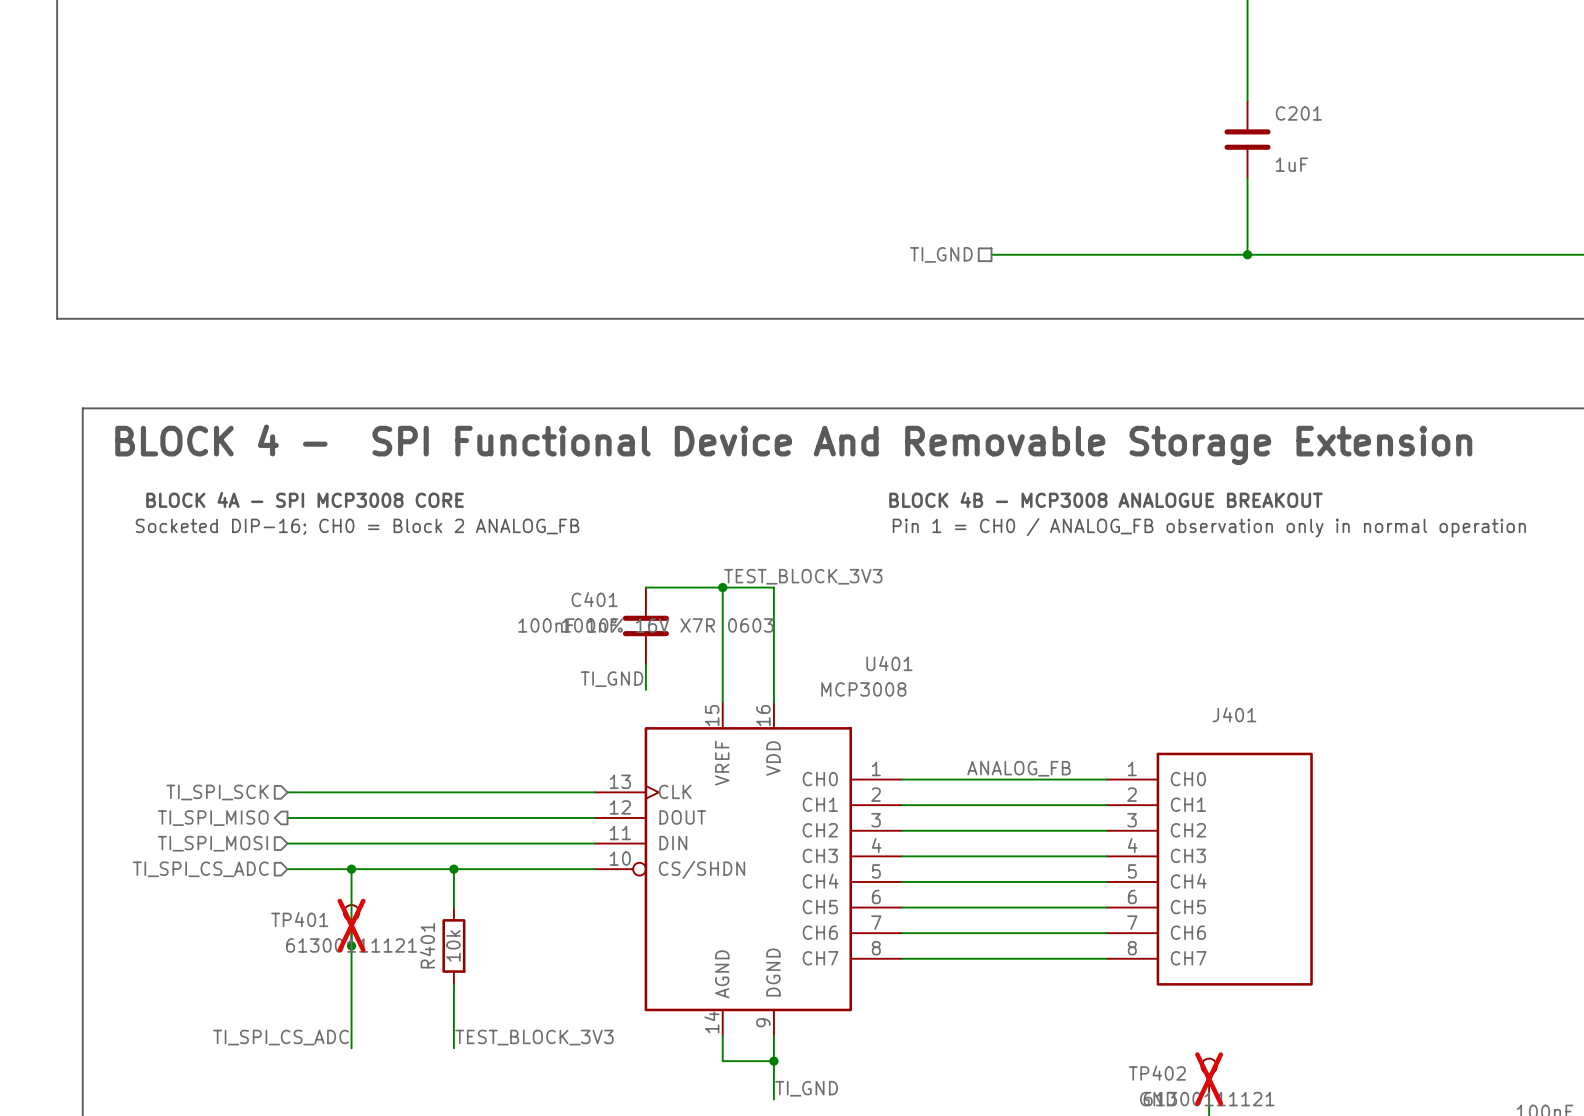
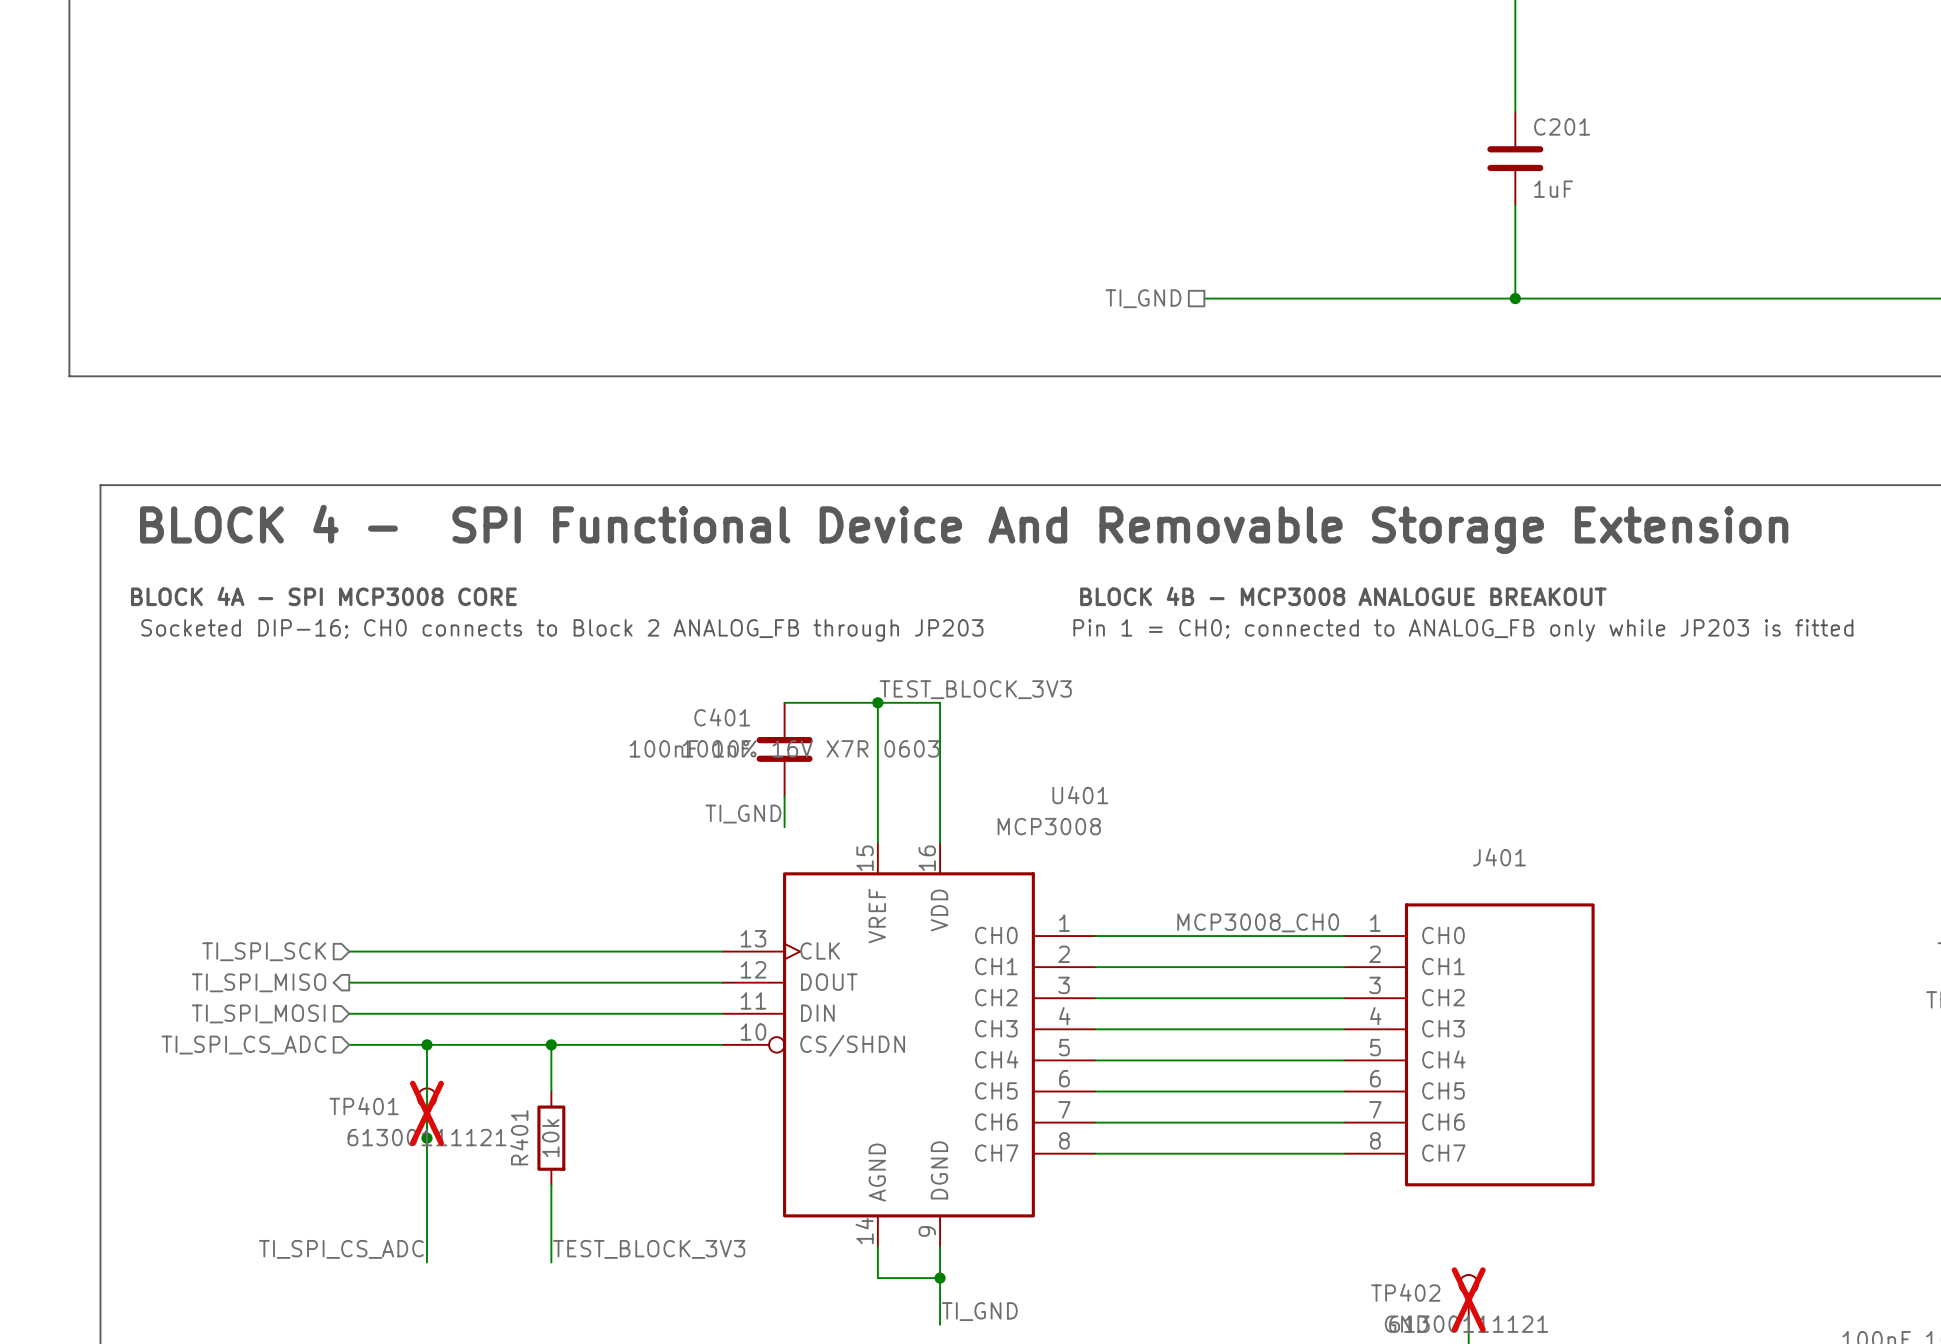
C201 name position: C201 (1298, 113) -> C201 (1562, 126)
C201 value position: 1uF (1291, 164) -> 1uF (1553, 189)
text position: BLOCK 4A - SPI MCP3008 CORE (305, 499) -> BLOCK 4A - SPI MCP3008 CORE (323, 596)
text: Socketed DIP-16; CH0 = Block 2 ANALOG_FB (357, 526) -> Socketed DIP-16; CH0 connects to Block 2 ANALOG_FB through JP203 (562, 630)
text: Pin 1 = CH0 / ANALOG_FB observation only in normal operation (1209, 527) -> Pin 1 = CH0; connected to ANALOG_FB only while JP203 is fitted (1463, 630)
label: ANALOG_FB (1019, 768) -> MCP3008_CH0 (1258, 922)

